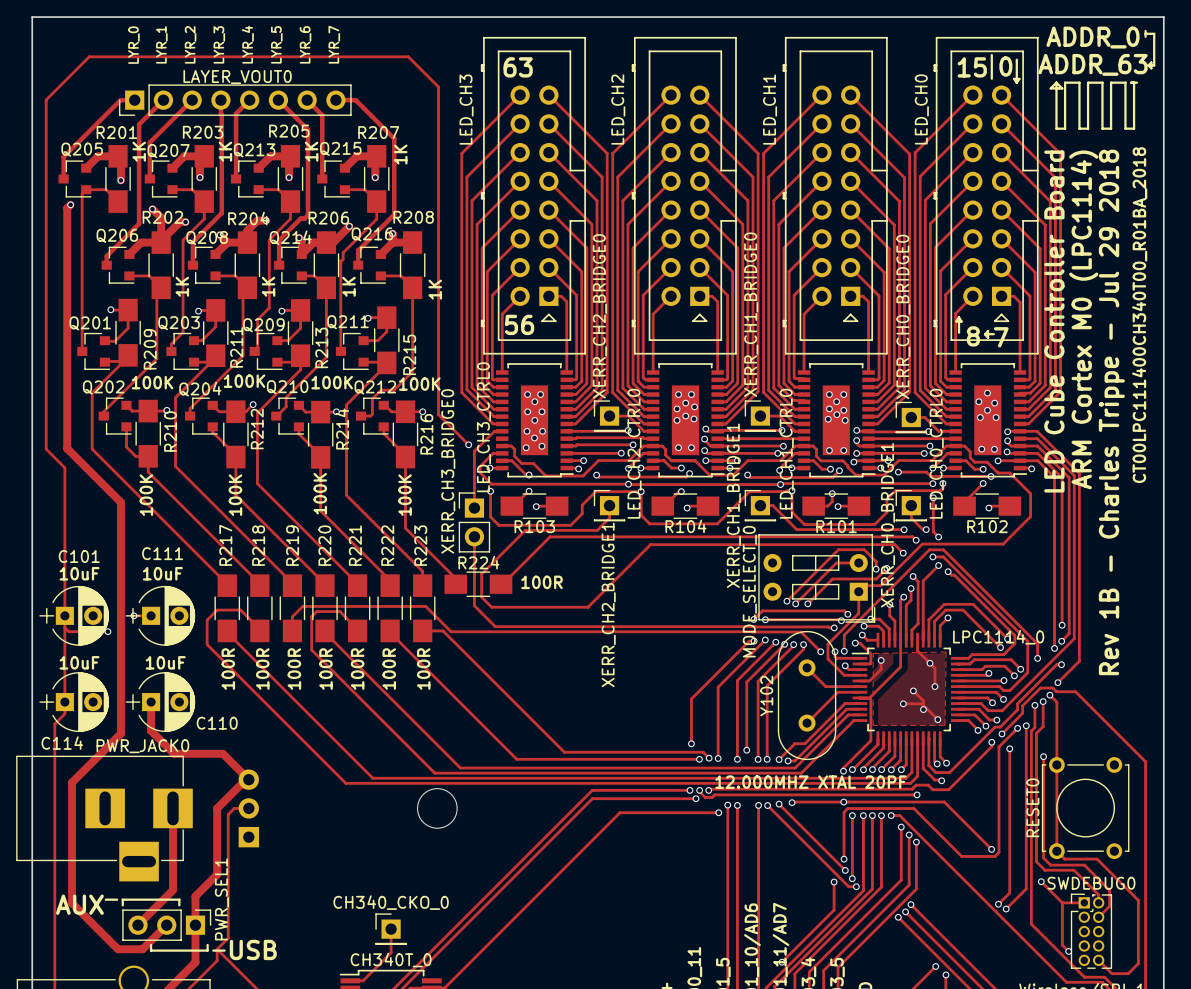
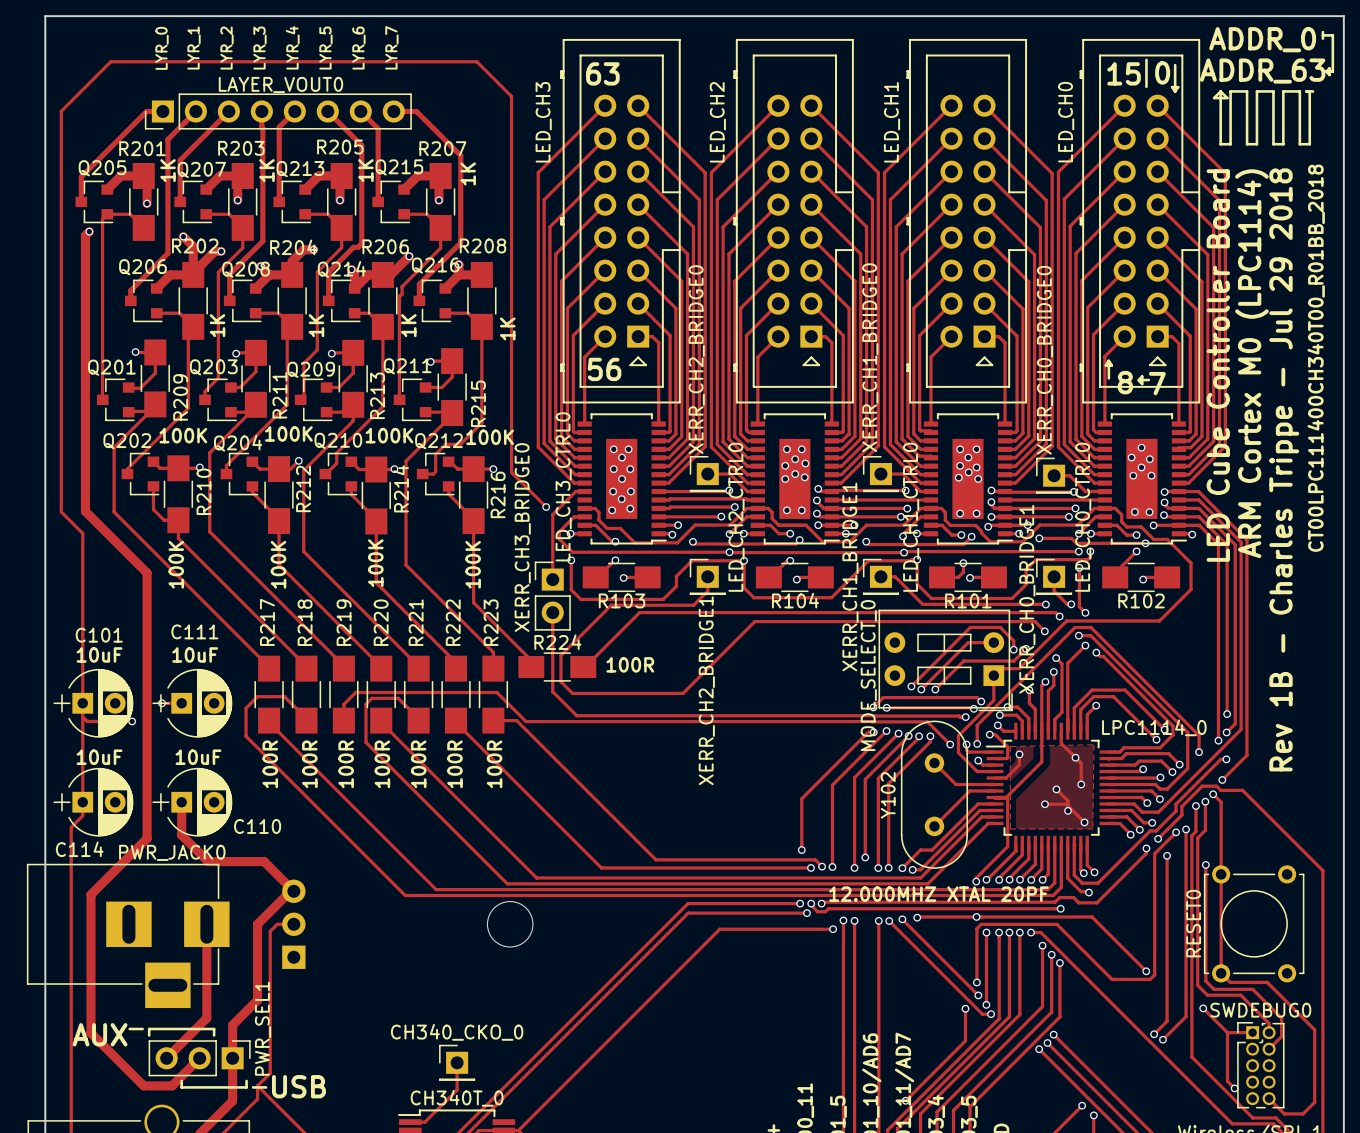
text: CT00LPC111400CH340T00_R01BA_2018 (1139, 315) -> CT00LPC111400CH340T00_R01BB_2018 (1316, 358)

